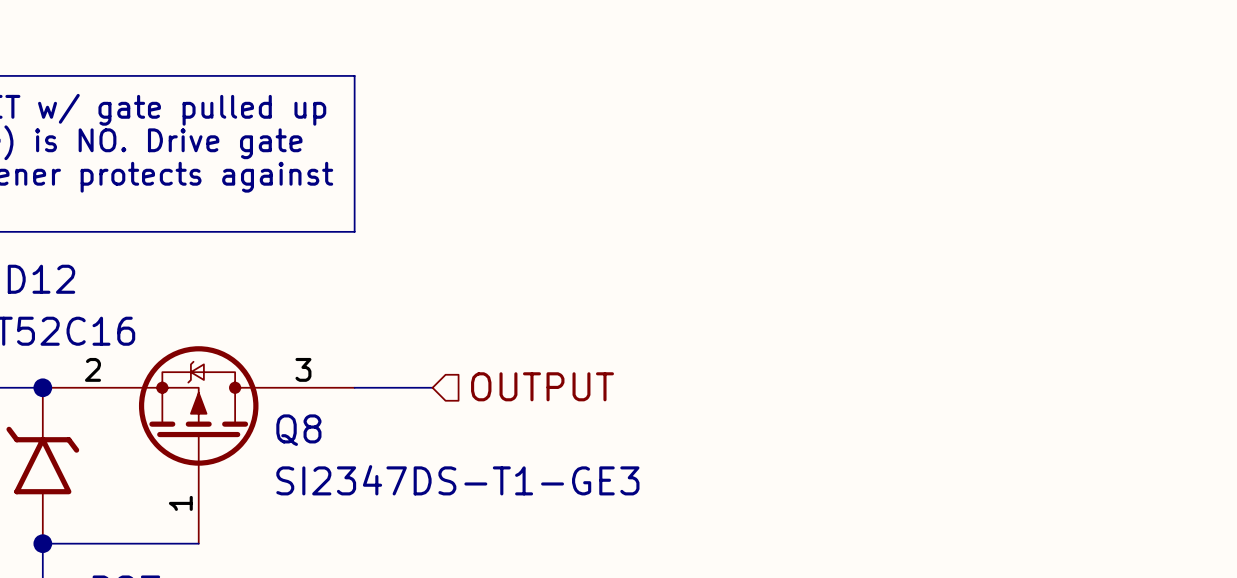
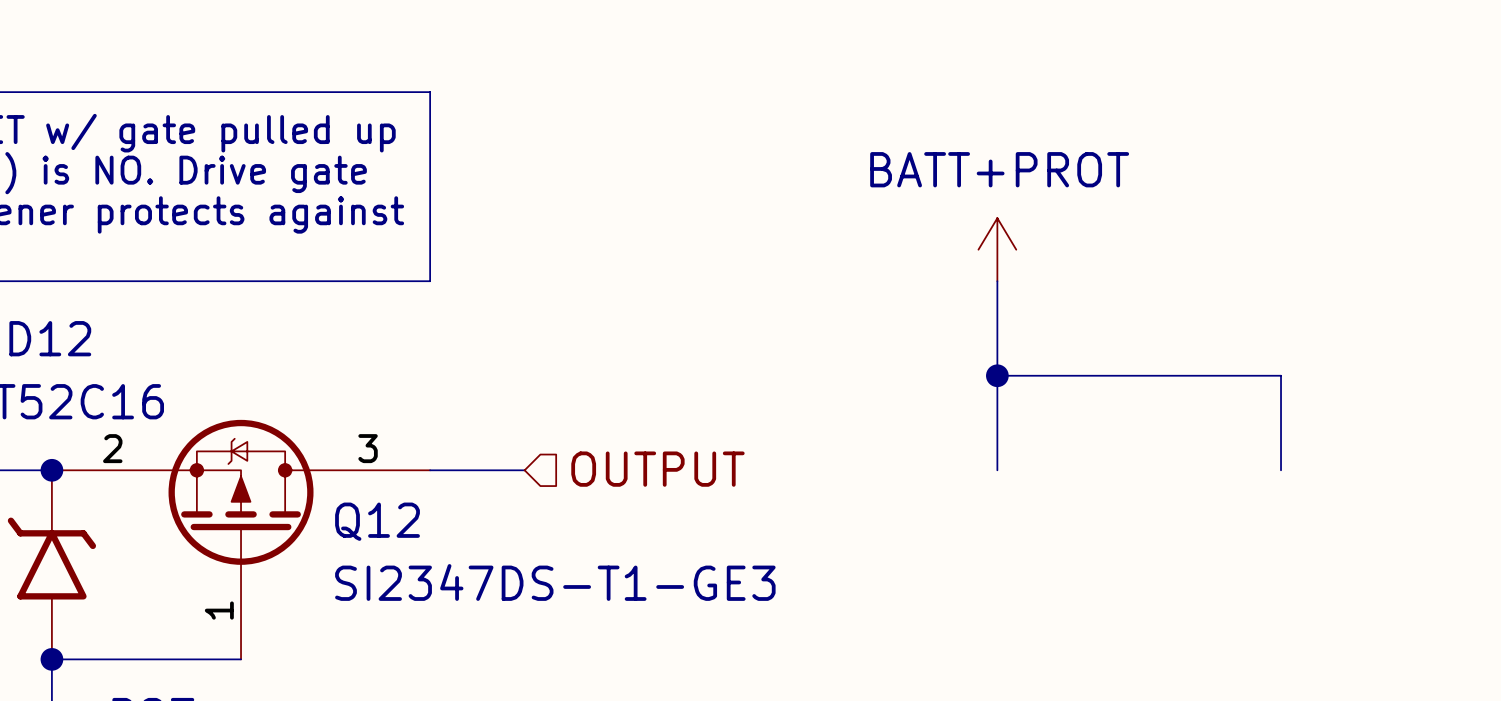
power symbol: none -> BATT+PROT (997, 249)
wire: none -> (997, 281) (997, 470)
wire: none -> (997, 375) (1281, 375) (1281, 470)
junction: none -> (997, 375)
Q8 name: Q8 (298, 430) -> Q12 (377, 521)

